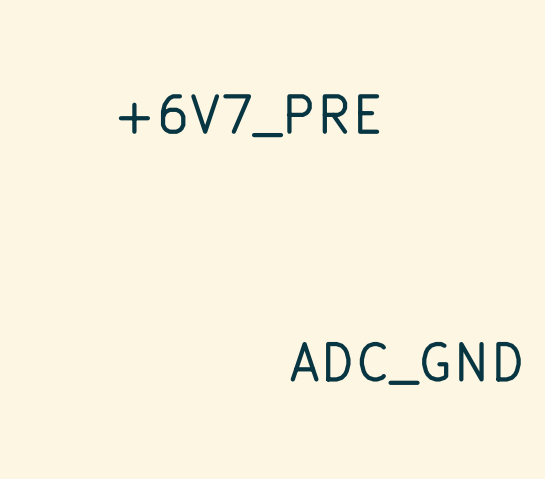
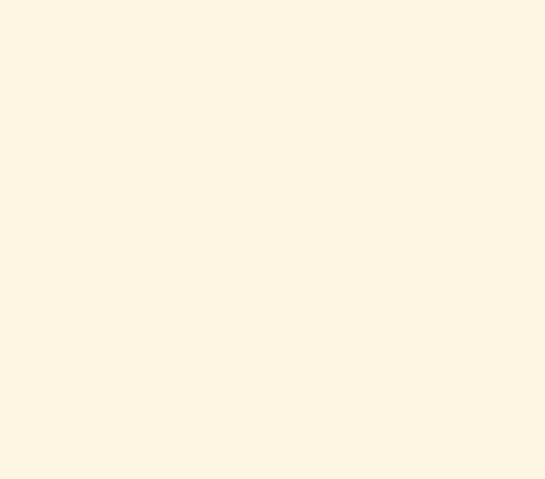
label: +6V7_PRE (248, 115) -> none
label: ADC_GND (405, 363) -> none

